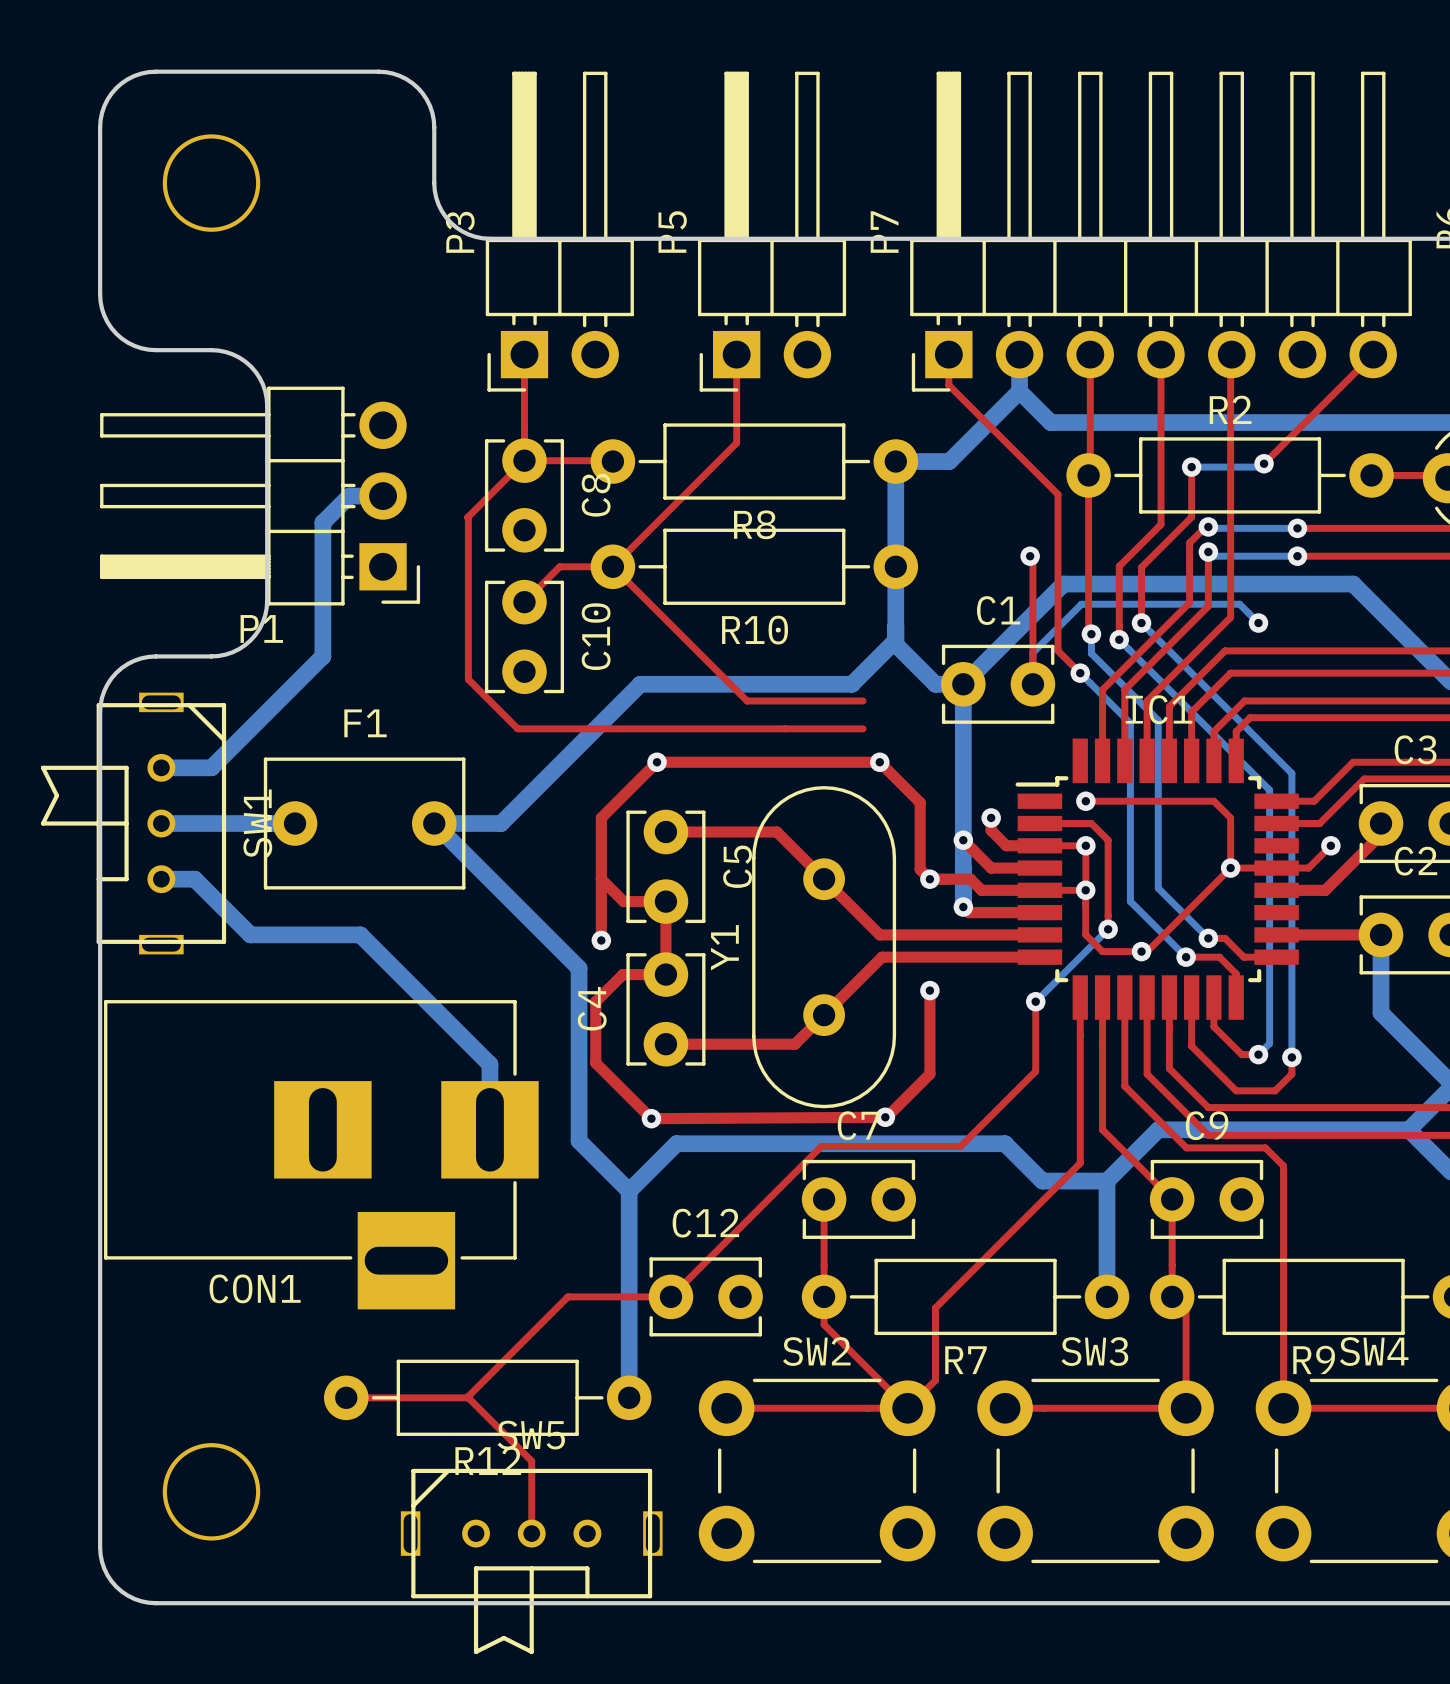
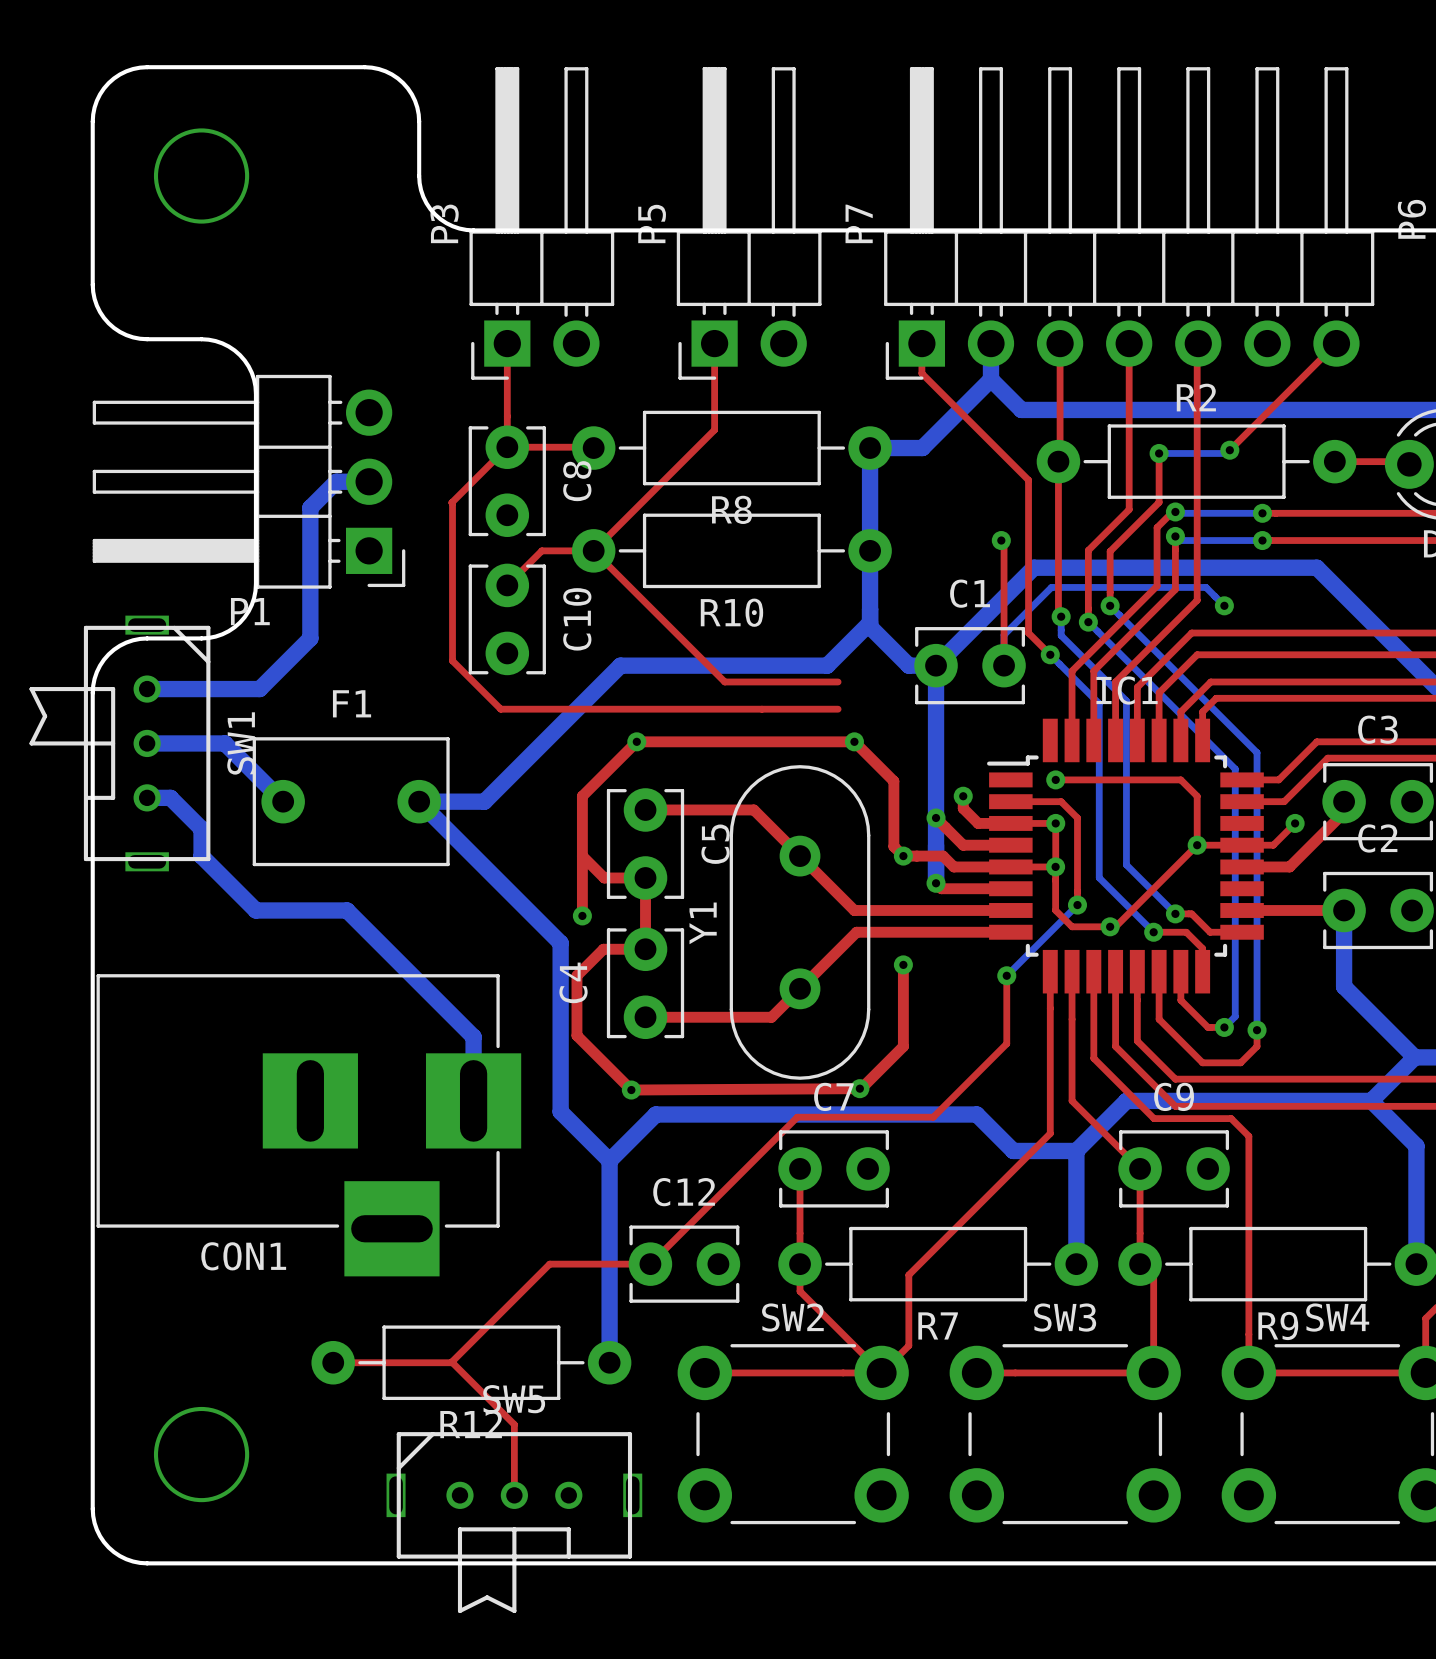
bottom track: (271, 708) (211, 767) (161, 767) -> (259, 689) (147, 689)
SW1 position: (133, 823) -> (119, 743)
bottom track: (161, 823) (295, 823) -> (147, 743) (224, 743) (283, 801)
bottom track: (161, 879) (194, 879) (250, 934) (267, 934) -> (147, 797) (170, 797) (201, 828) (201, 856) (255, 910)

